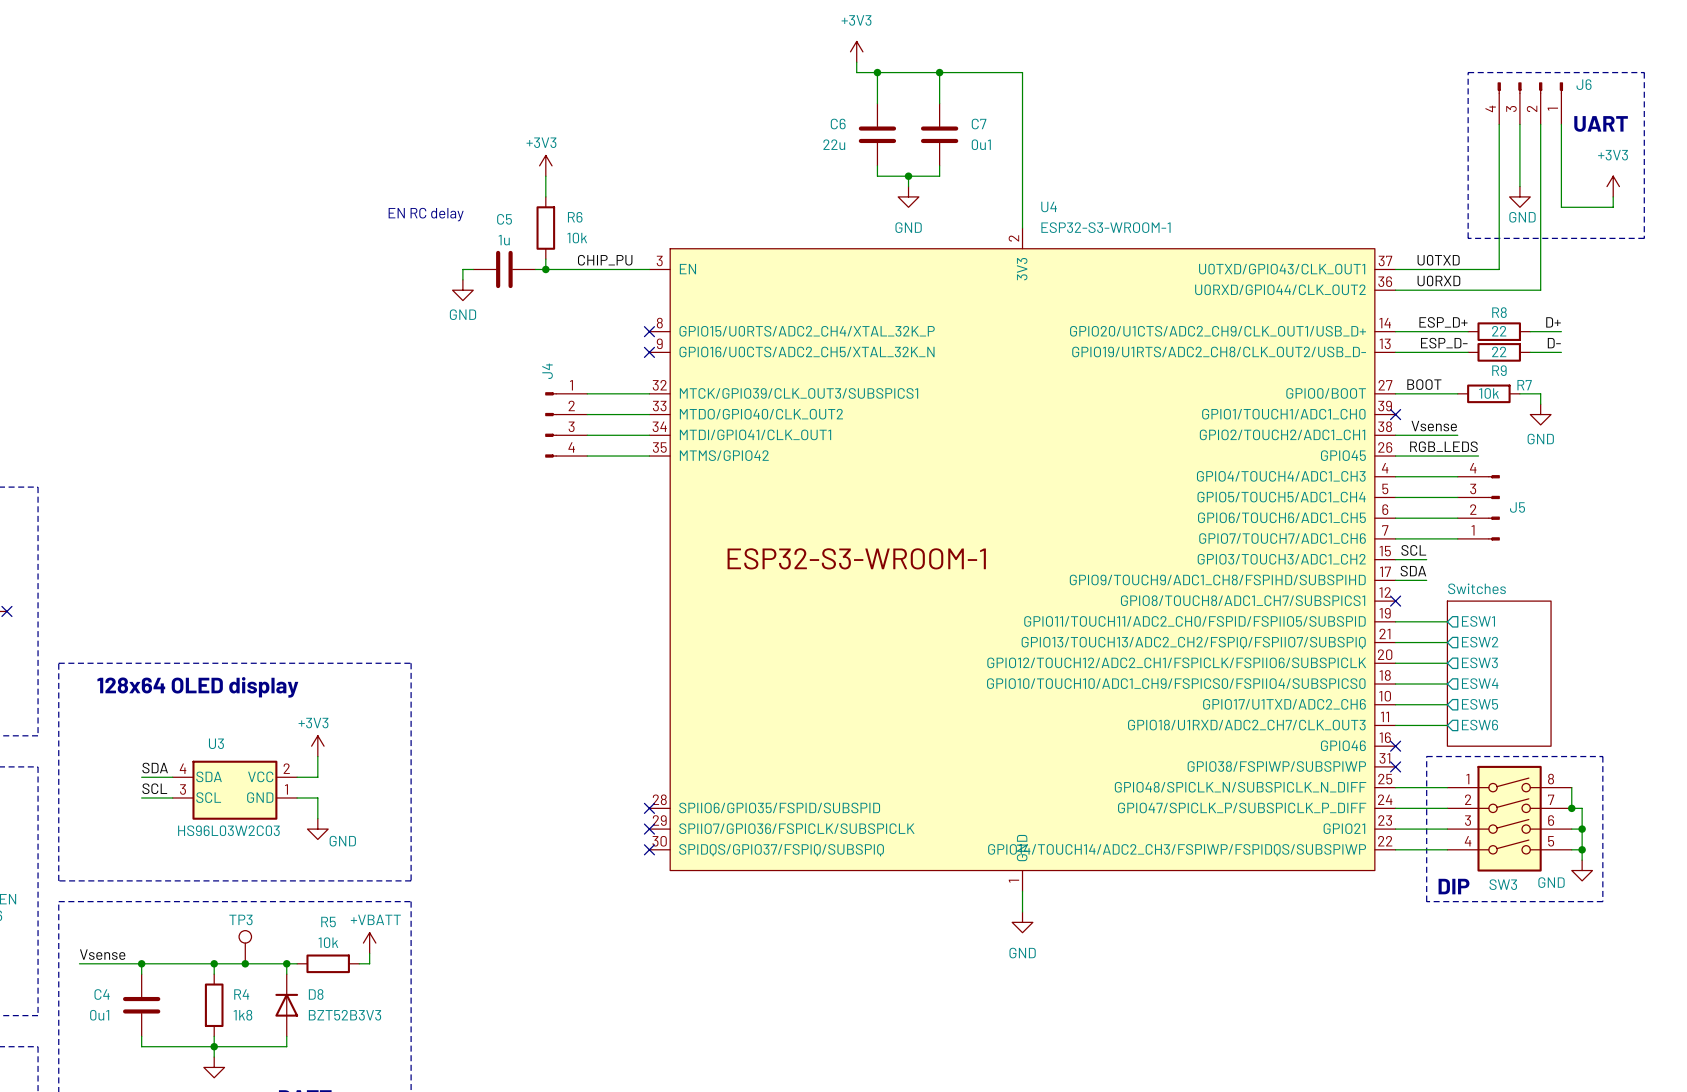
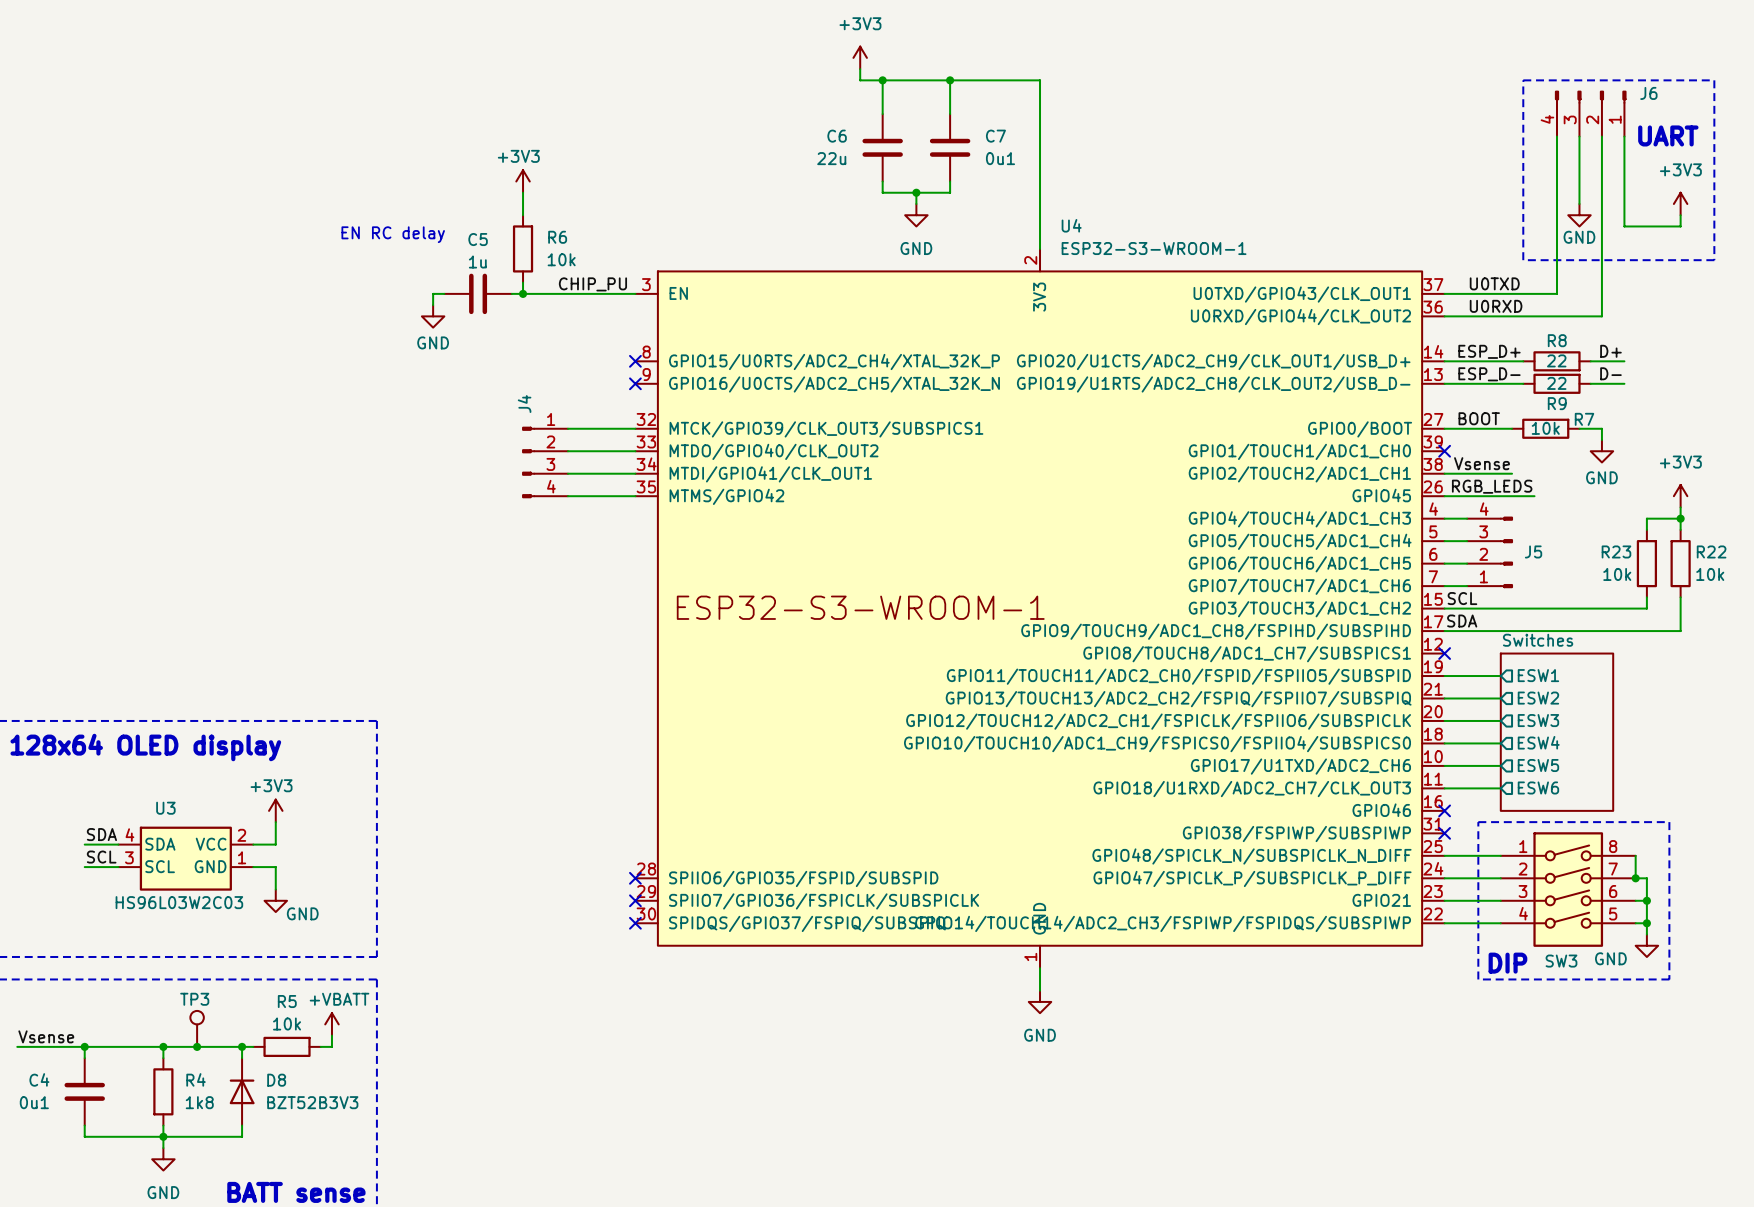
power symbol: none -> +3V3 (1680, 496)
wire: none -> (1680, 507) (1680, 529)
wire: none -> (1680, 518) (1646, 518) (1646, 529)
junction: none -> (1680, 518)
J5 position: (1478, 507) -> (1489, 552)
R23: none -> 10k (1646, 563)
R22: none -> 10k (1680, 563)
wire: none -> (1646, 597) (1646, 608) (1478, 608)
wire: none -> (1680, 597) (1680, 631) (1478, 631)

